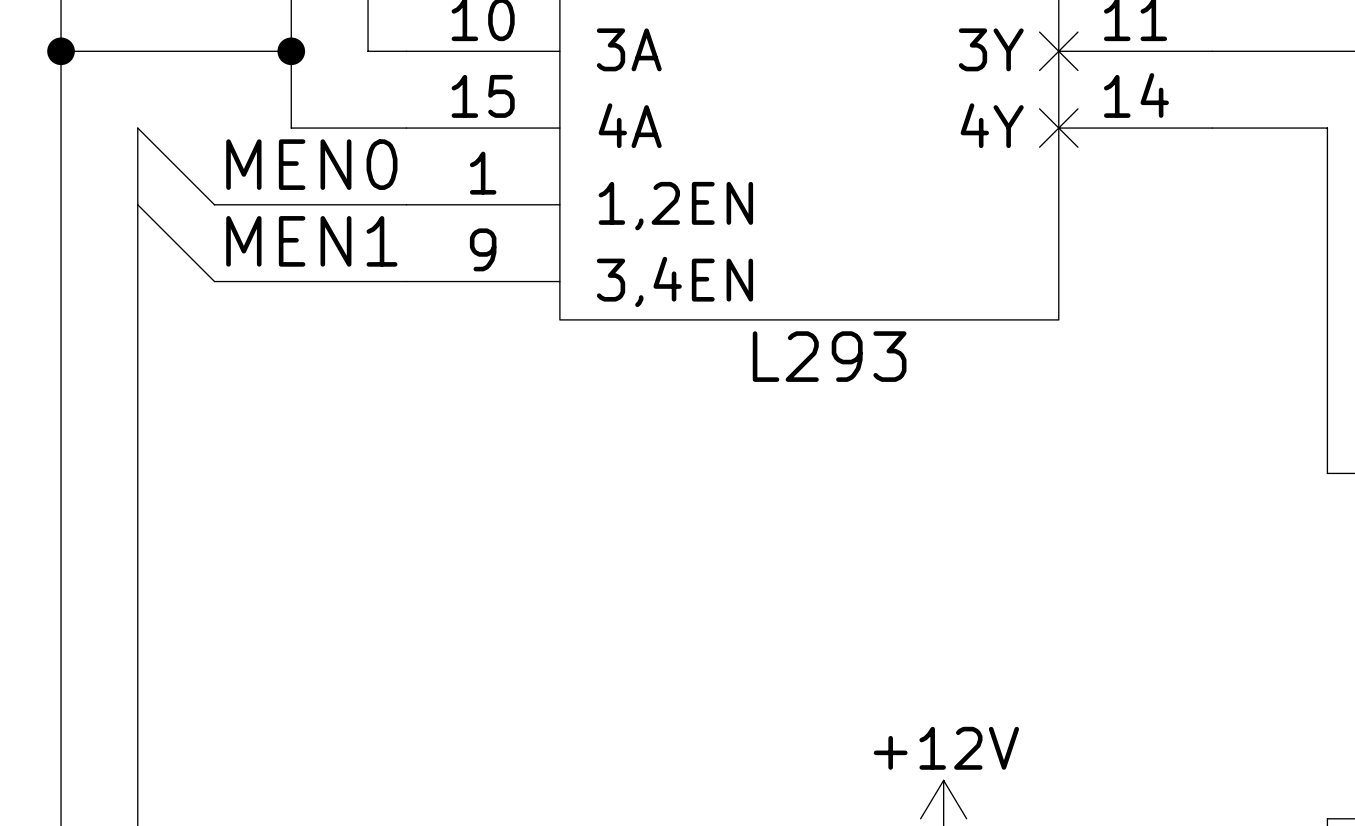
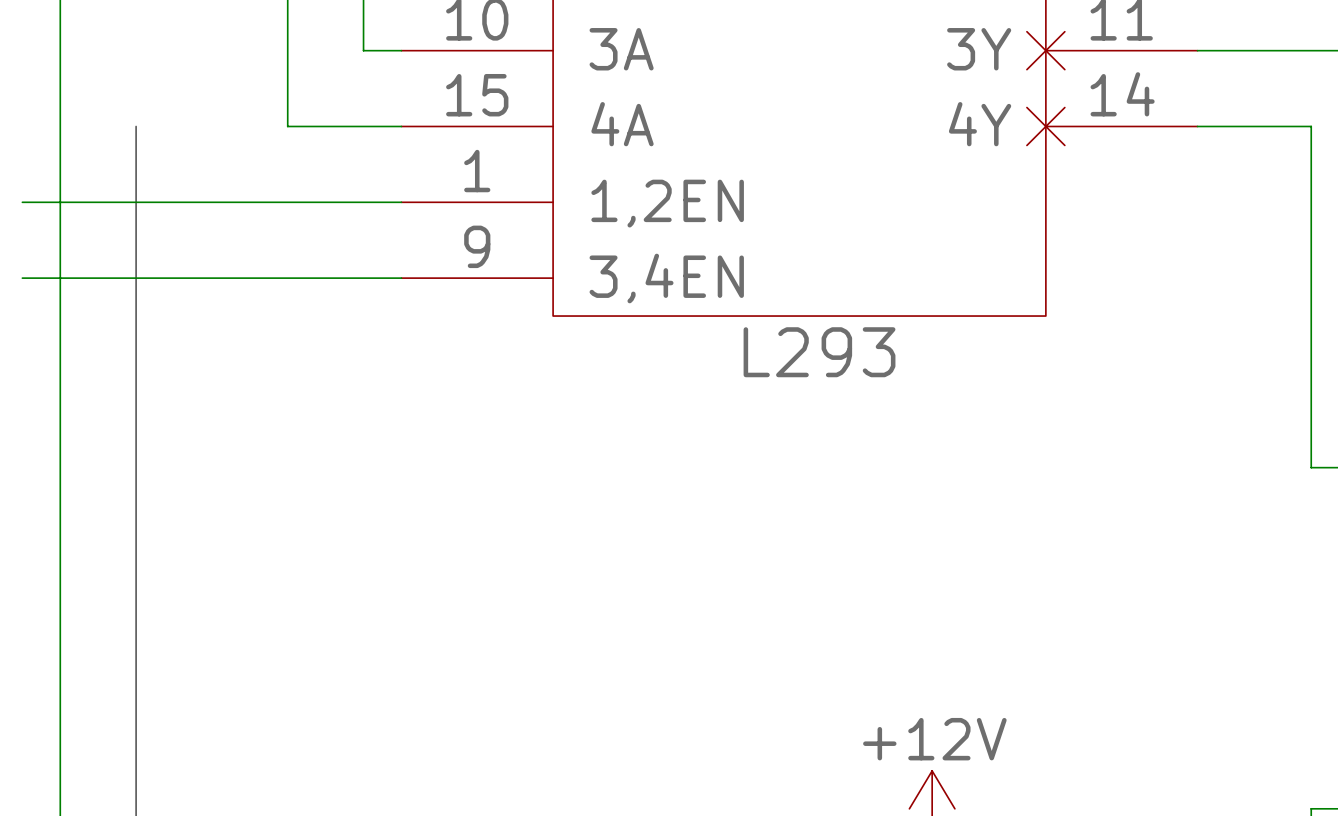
wire: (61, 51) (291, 51) -> none
junction: (61, 51) -> none
junction: (291, 51) -> none
wire: (137, 128) (214, 204) -> (22, 202) (211, 202)
label: MEN0 (311, 164) -> none
wire: (137, 204) (214, 281) -> (22, 278) (211, 278)
label: MEN1 (311, 241) -> none

